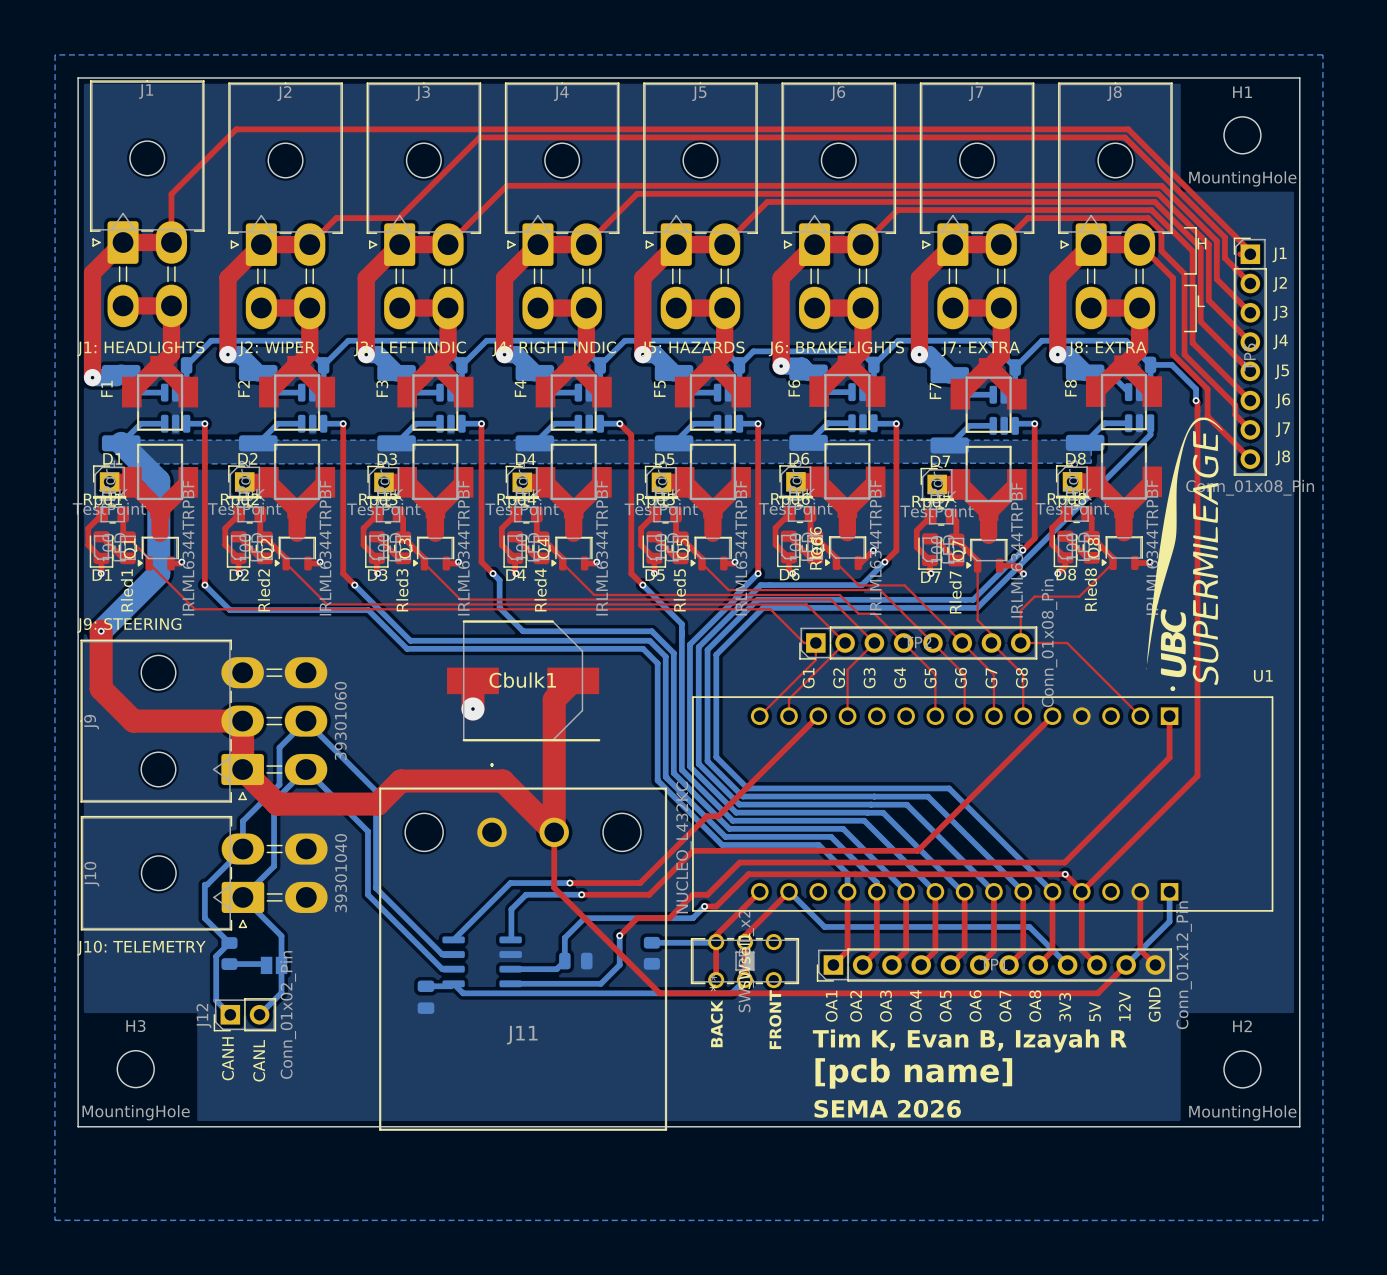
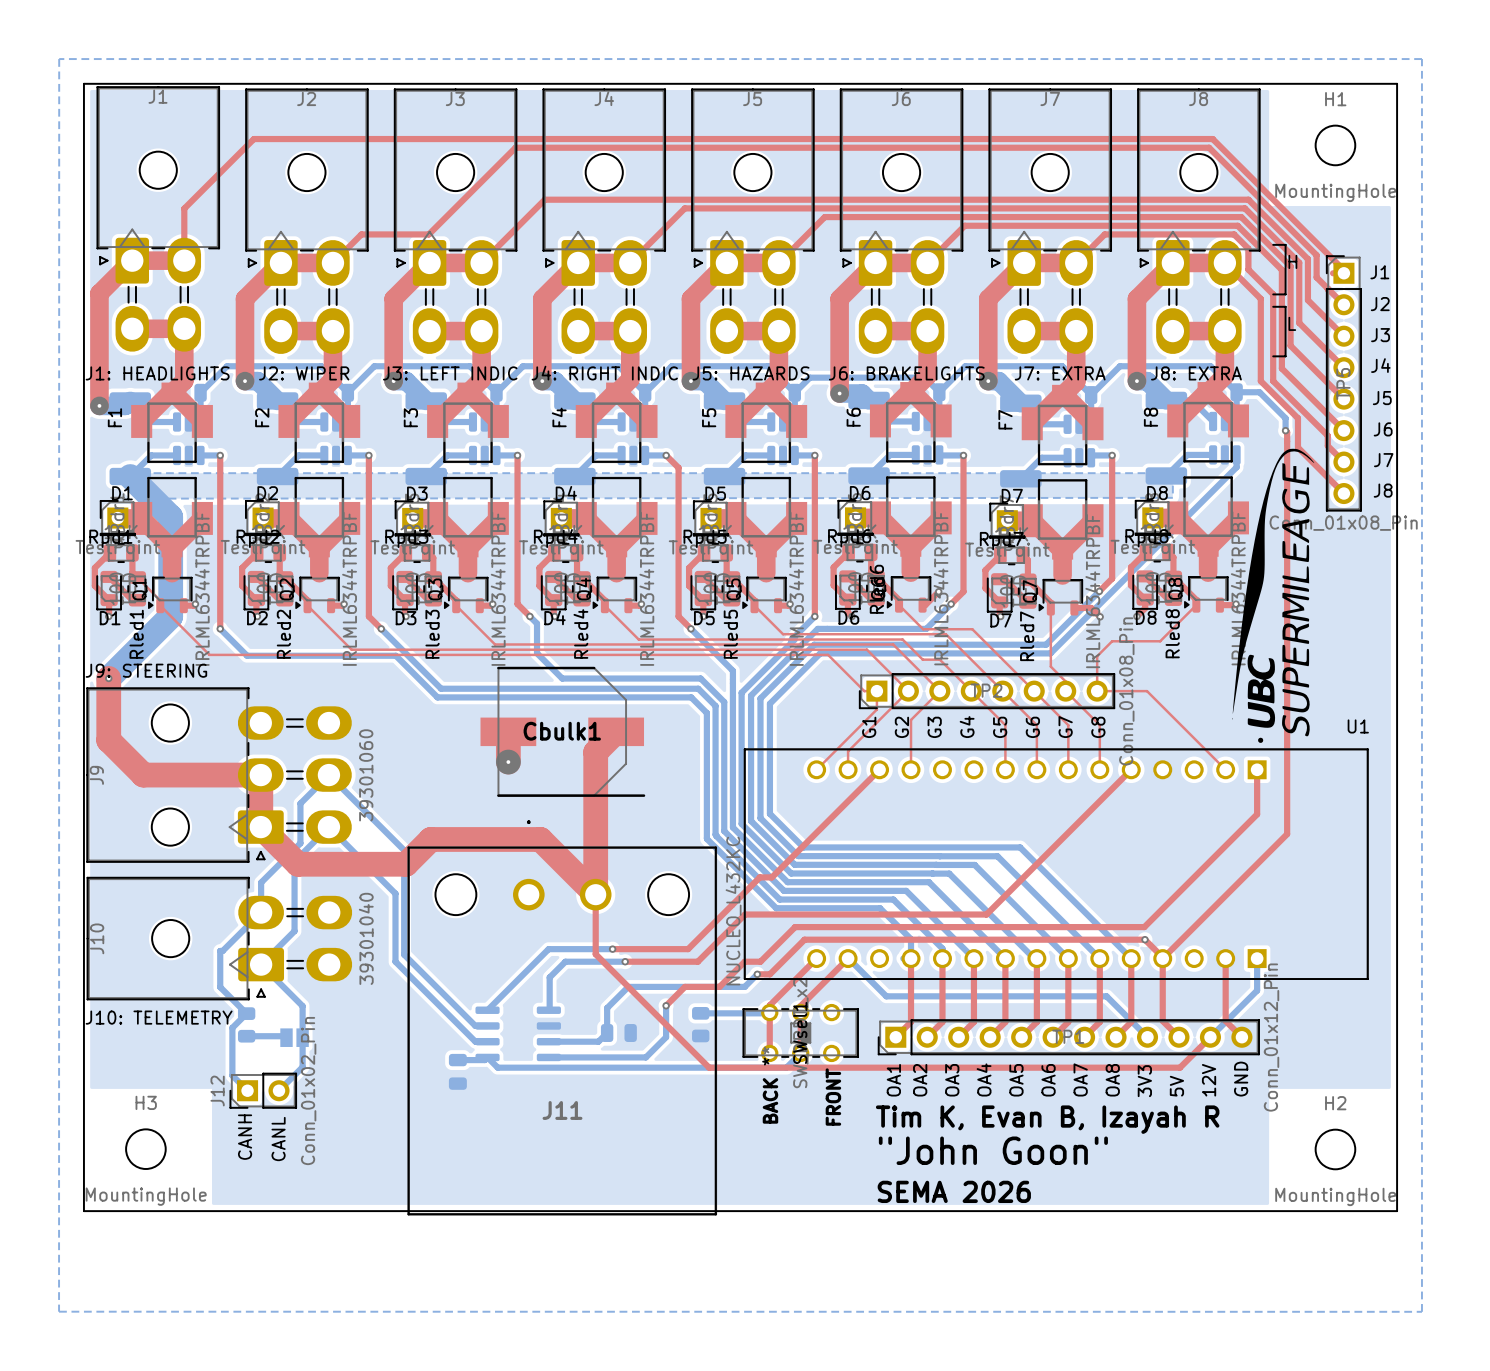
text: [pcb name] (913, 1073) -> "John Goon" (993, 1150)

